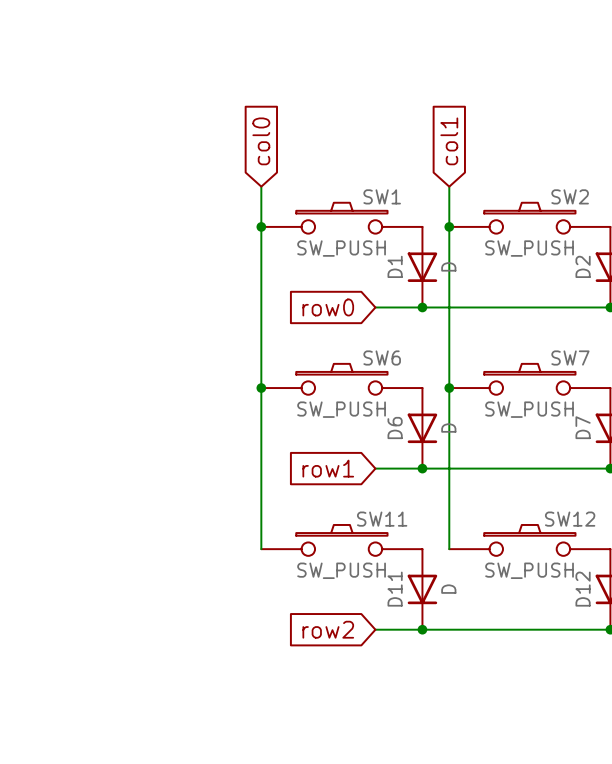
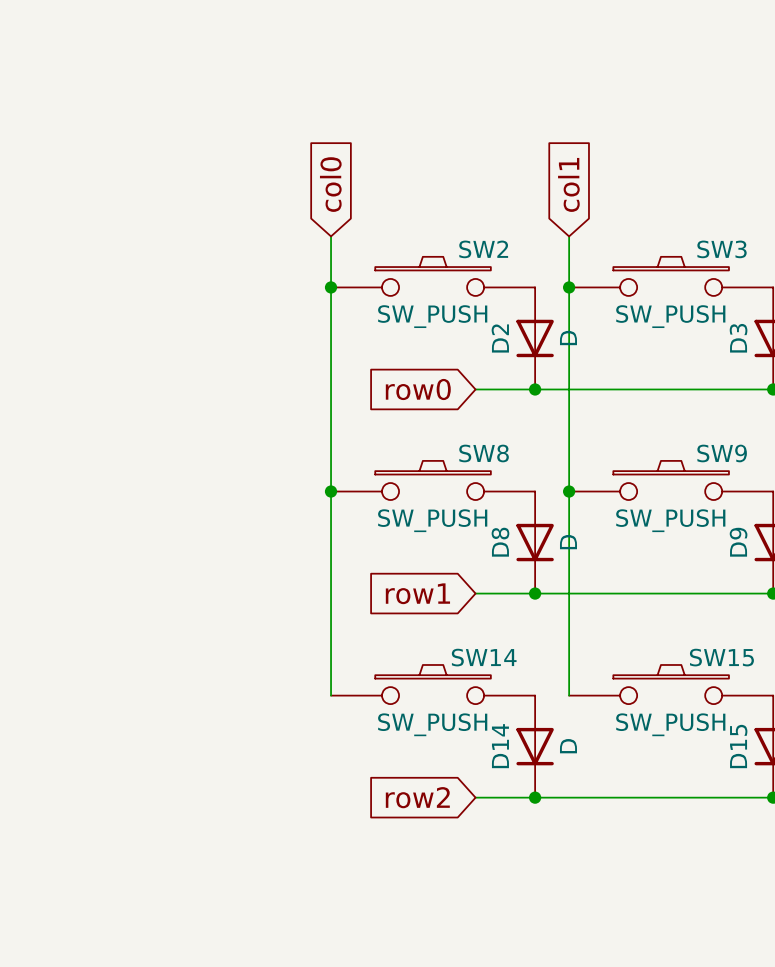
SW1 name: SW1 (382, 196) -> SW2 (483, 249)
SW2 name: SW2 (570, 196) -> SW3 (722, 249)
D1 name: D1 (395, 266) -> D2 (500, 338)
D2 name: D2 (583, 266) -> D3 (738, 338)
SW6 name: SW6 (382, 358) -> SW8 (484, 453)
SW7 name: SW7 (570, 358) -> SW9 (722, 453)
D6 name: D6 (395, 427) -> D8 (500, 542)
D7 name: D7 (583, 427) -> D9 (738, 542)
SW11 name: SW11 (382, 519) -> SW14 (484, 657)
SW12 name: SW12 (570, 519) -> SW15 (721, 657)
D11 name: D11 (395, 589) -> D14 (500, 746)
D12 name: D12 (583, 589) -> D15 (738, 746)

